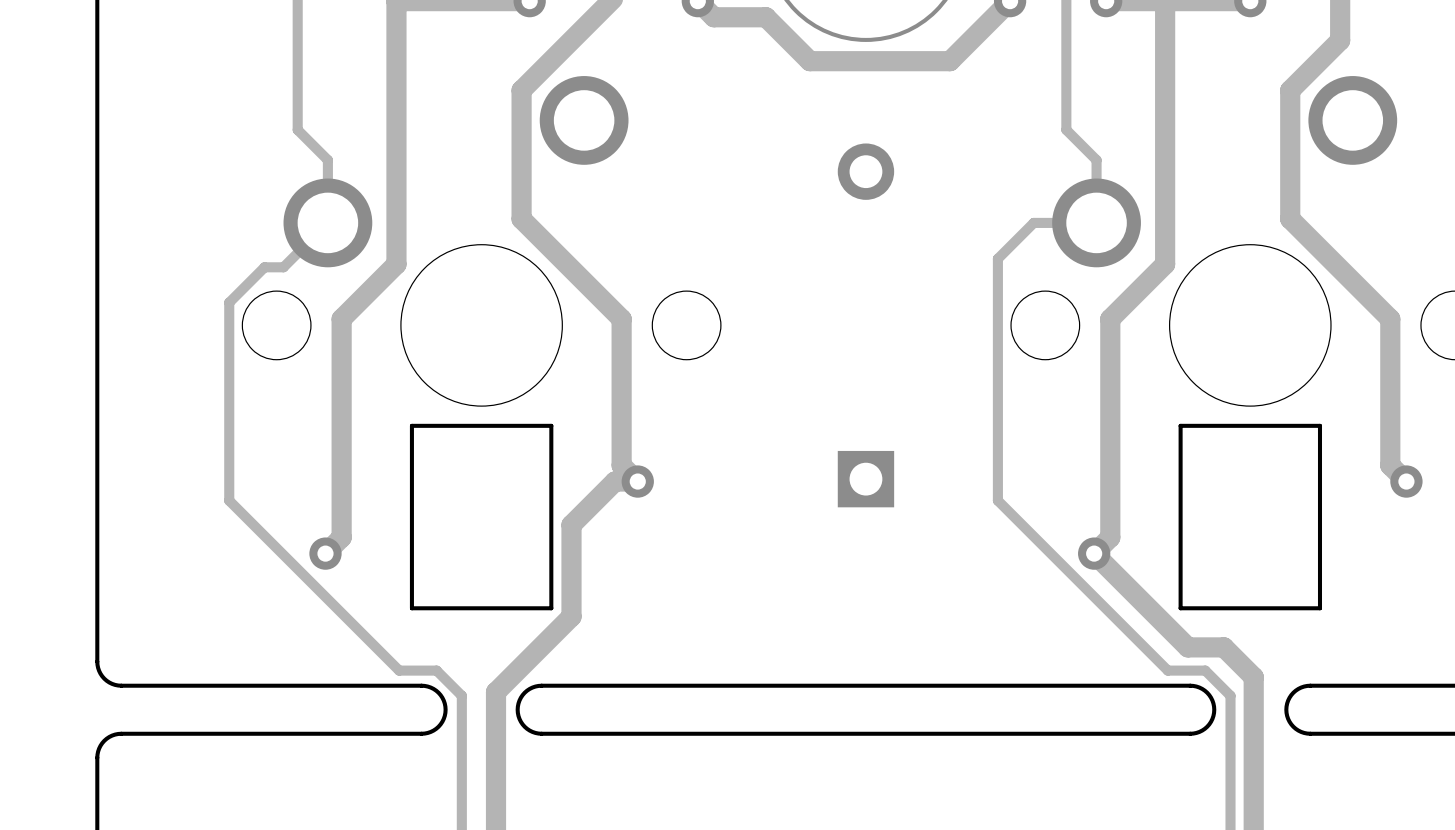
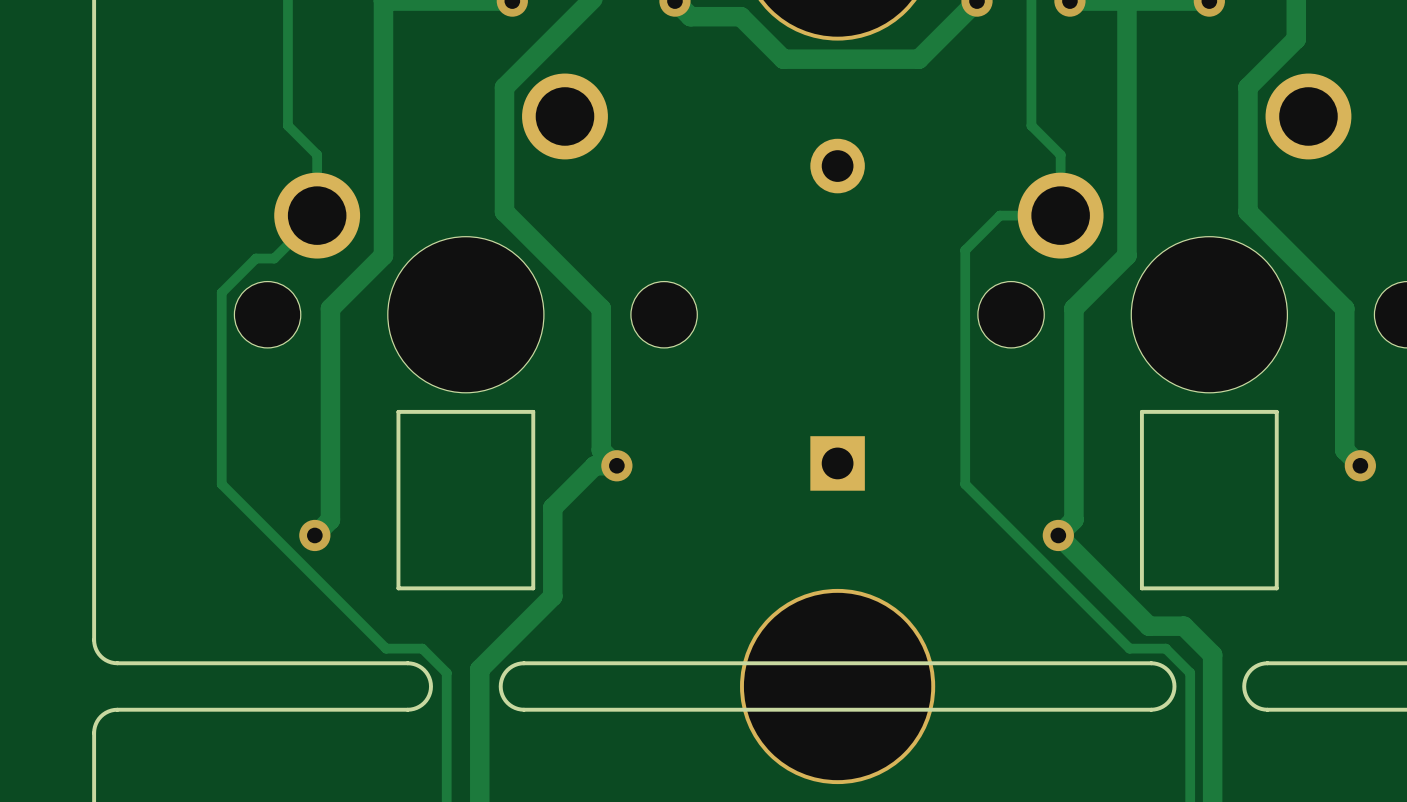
part: none -> (837, 686)

